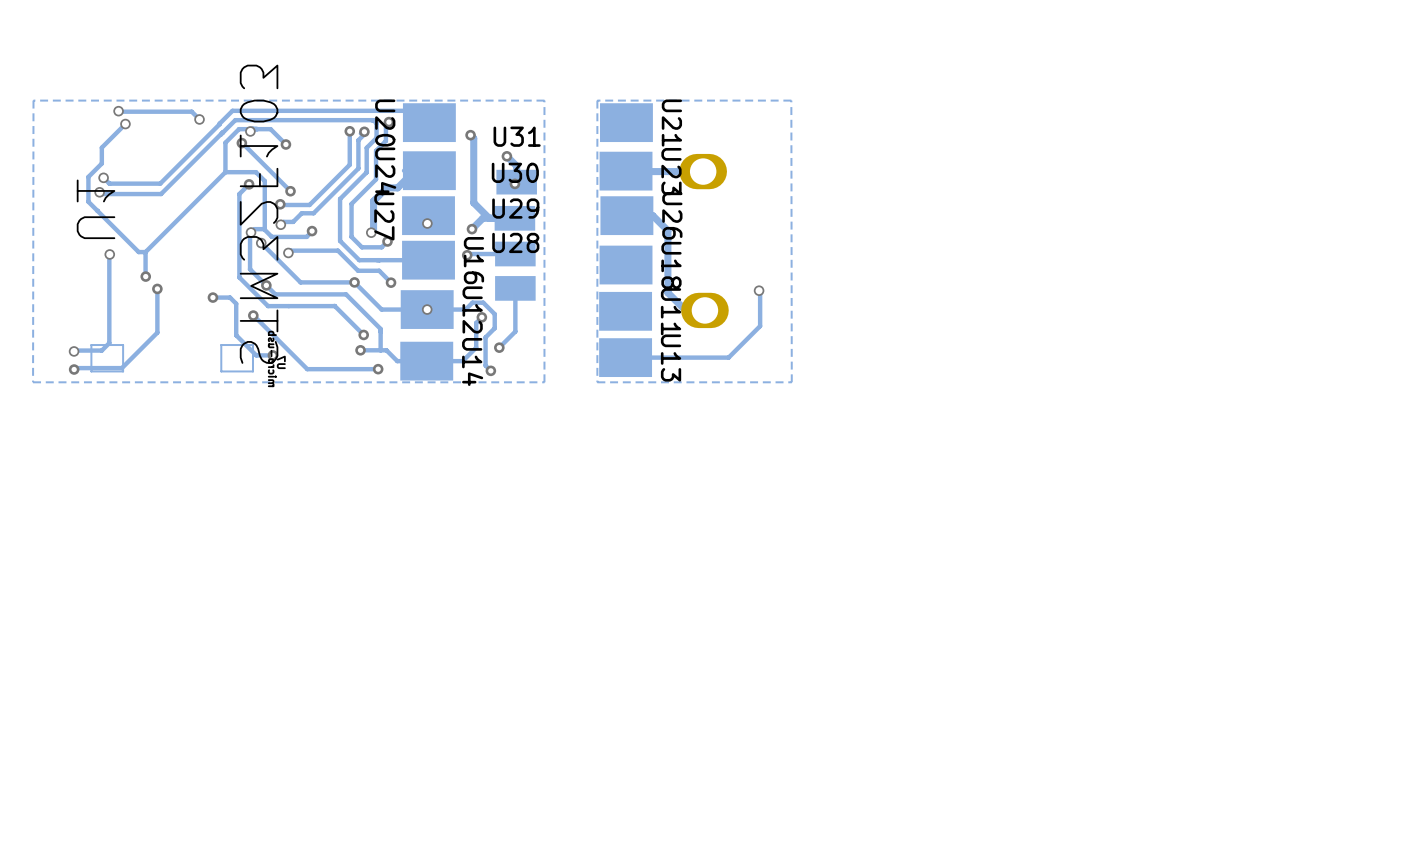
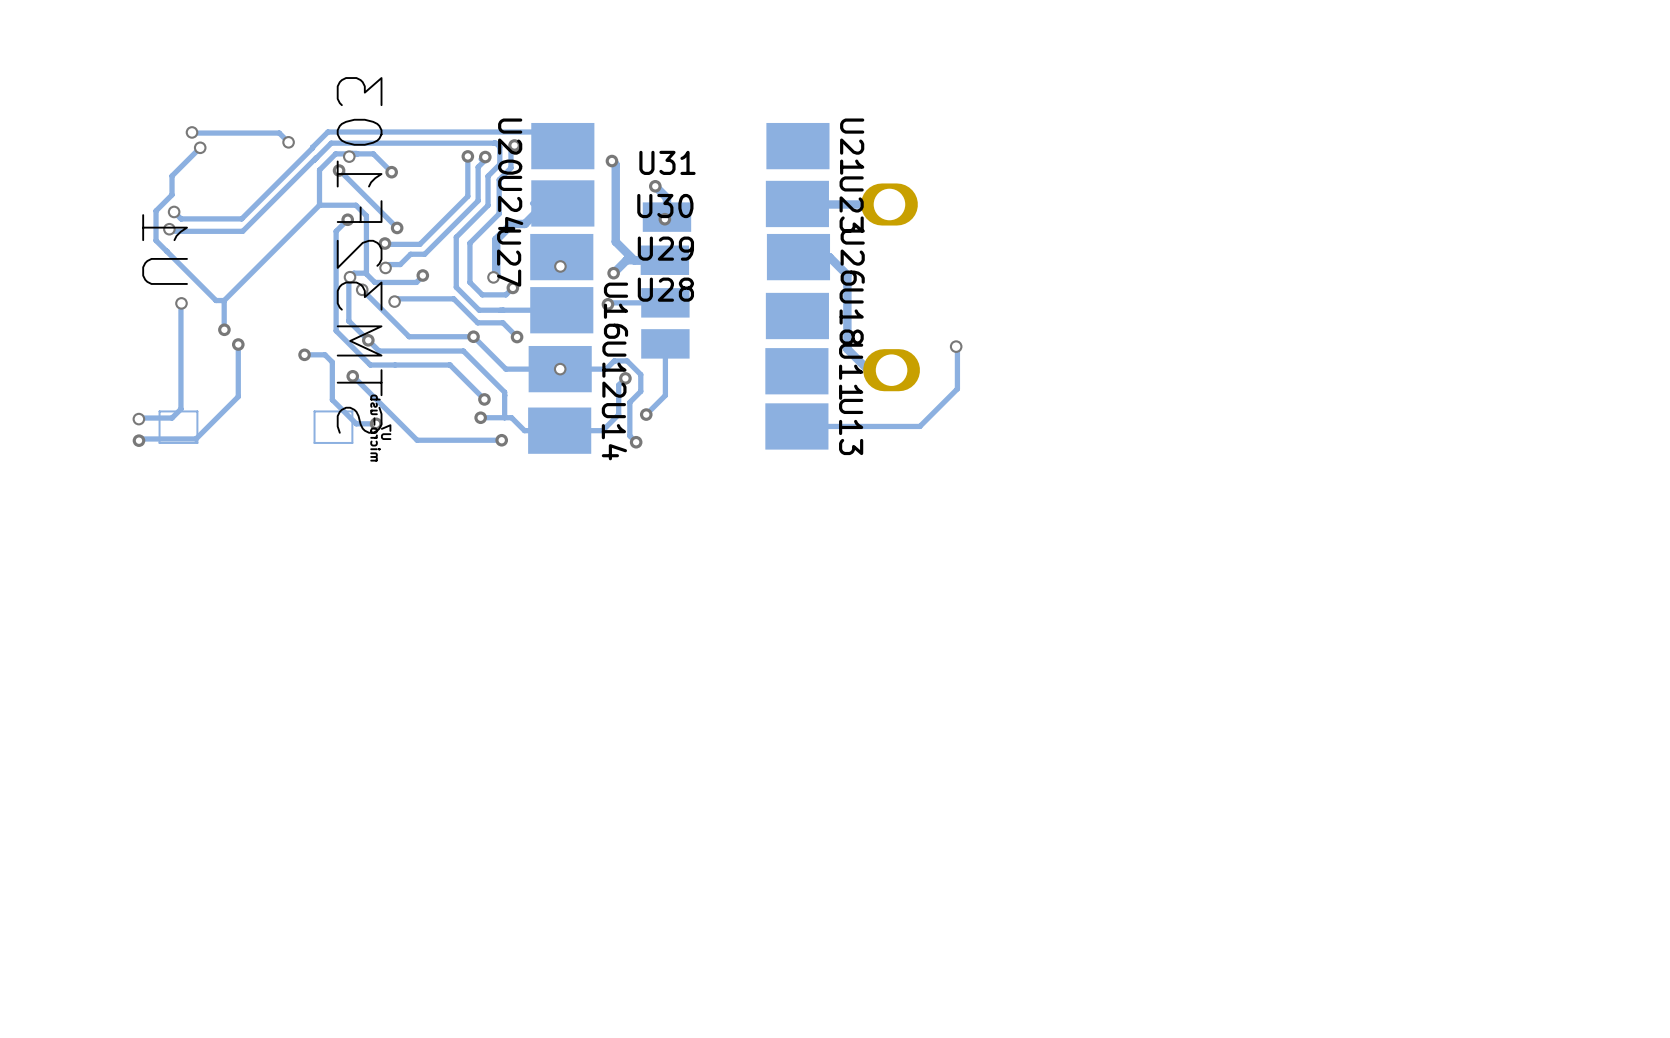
zone outline: (544, 100) (33, 100) (33, 382) (544, 382) (544, 100) -> none
zone outline: (791, 100) (597, 100) (597, 382) (791, 382) (791, 100) -> none

